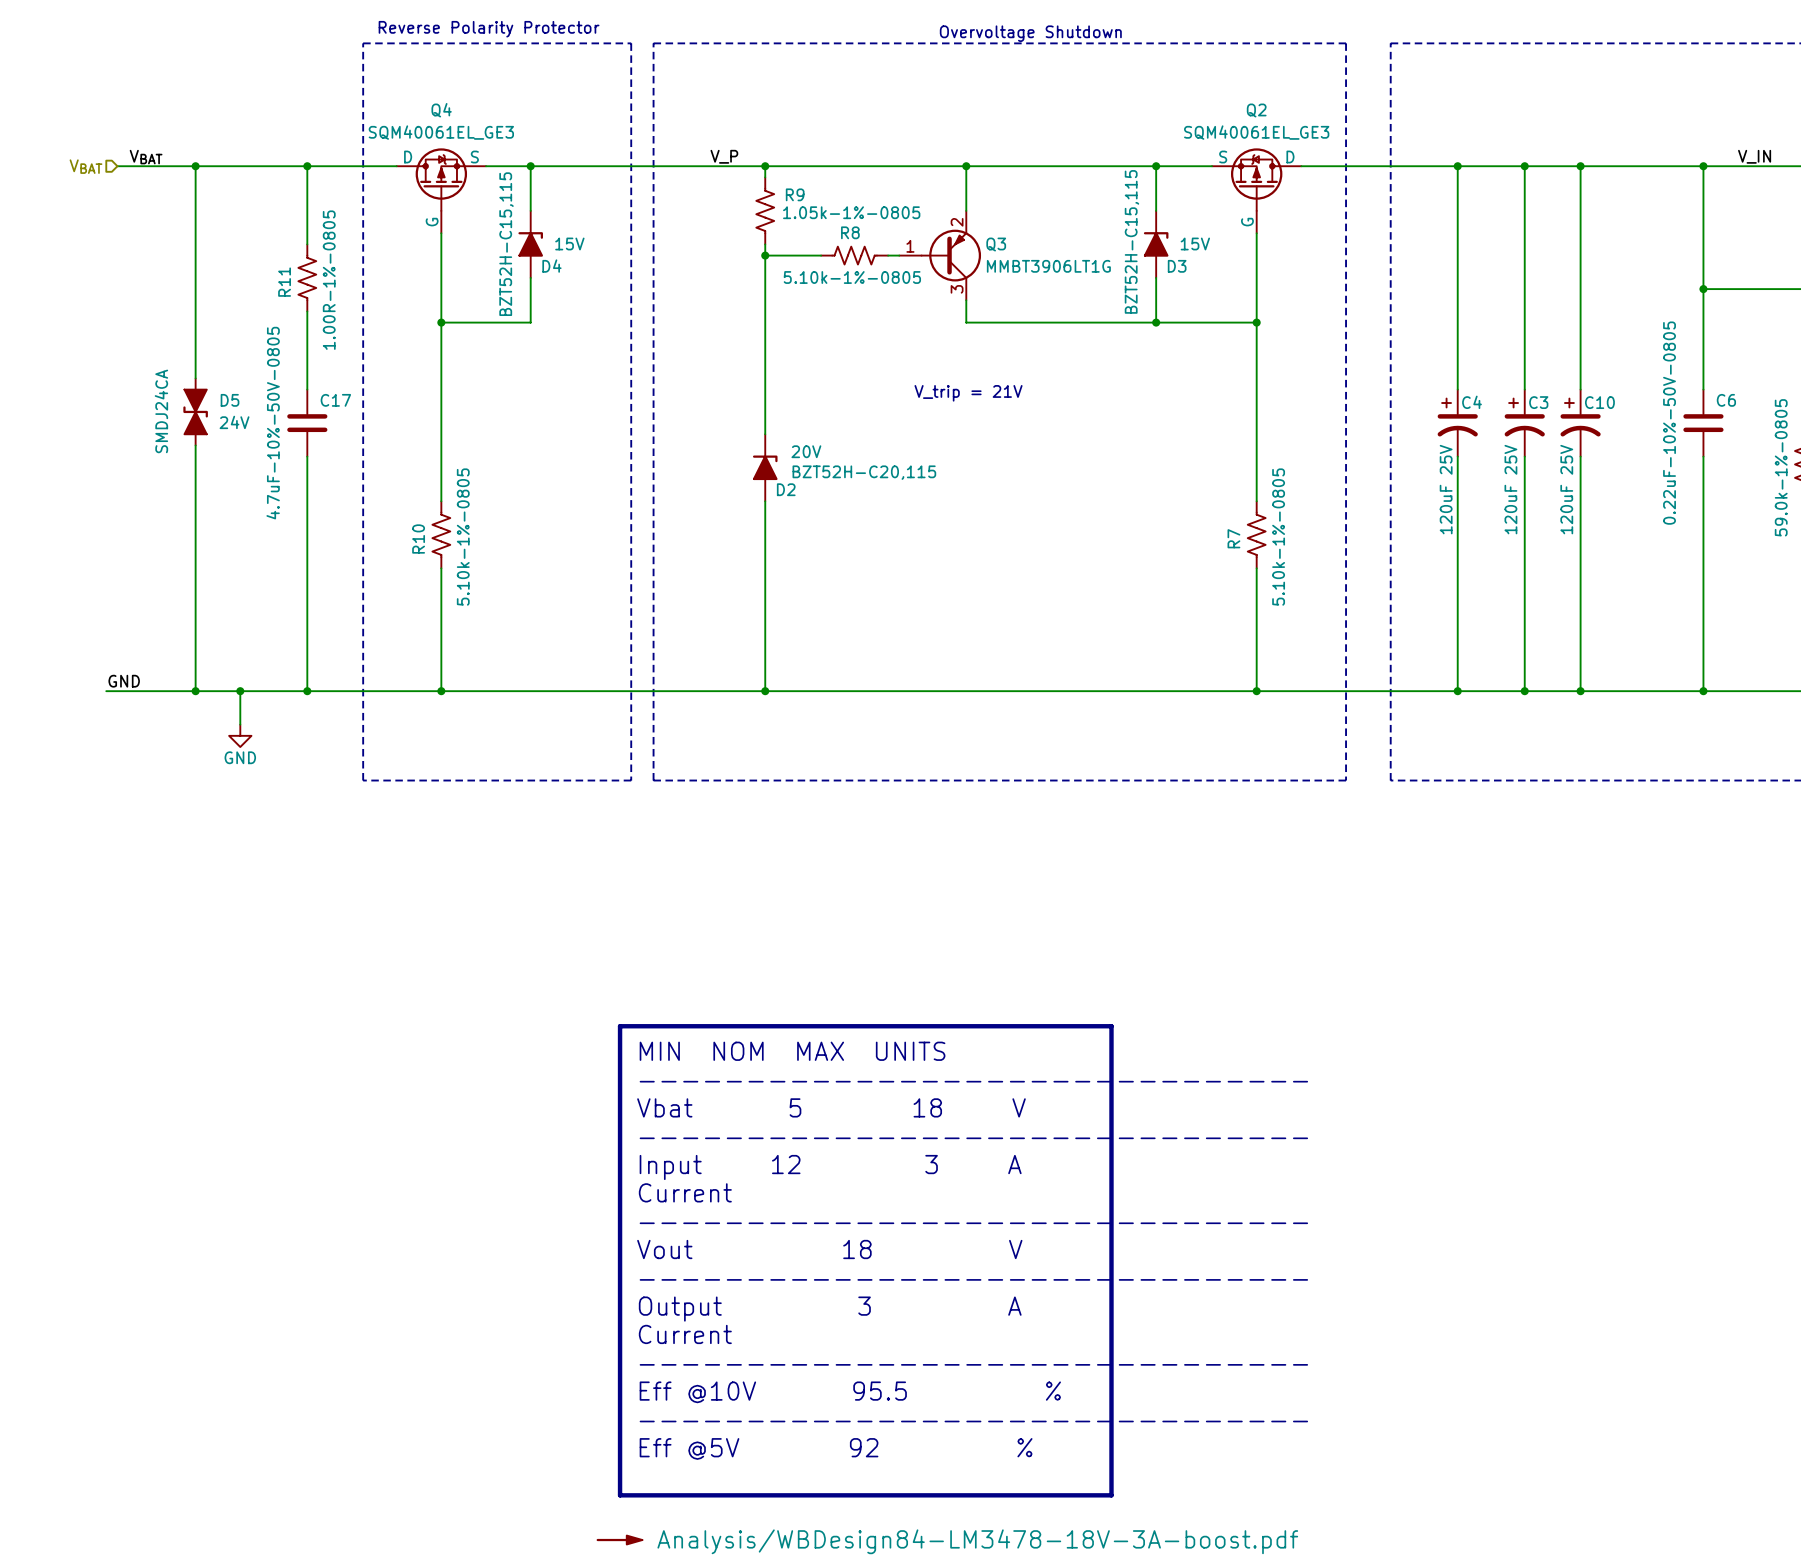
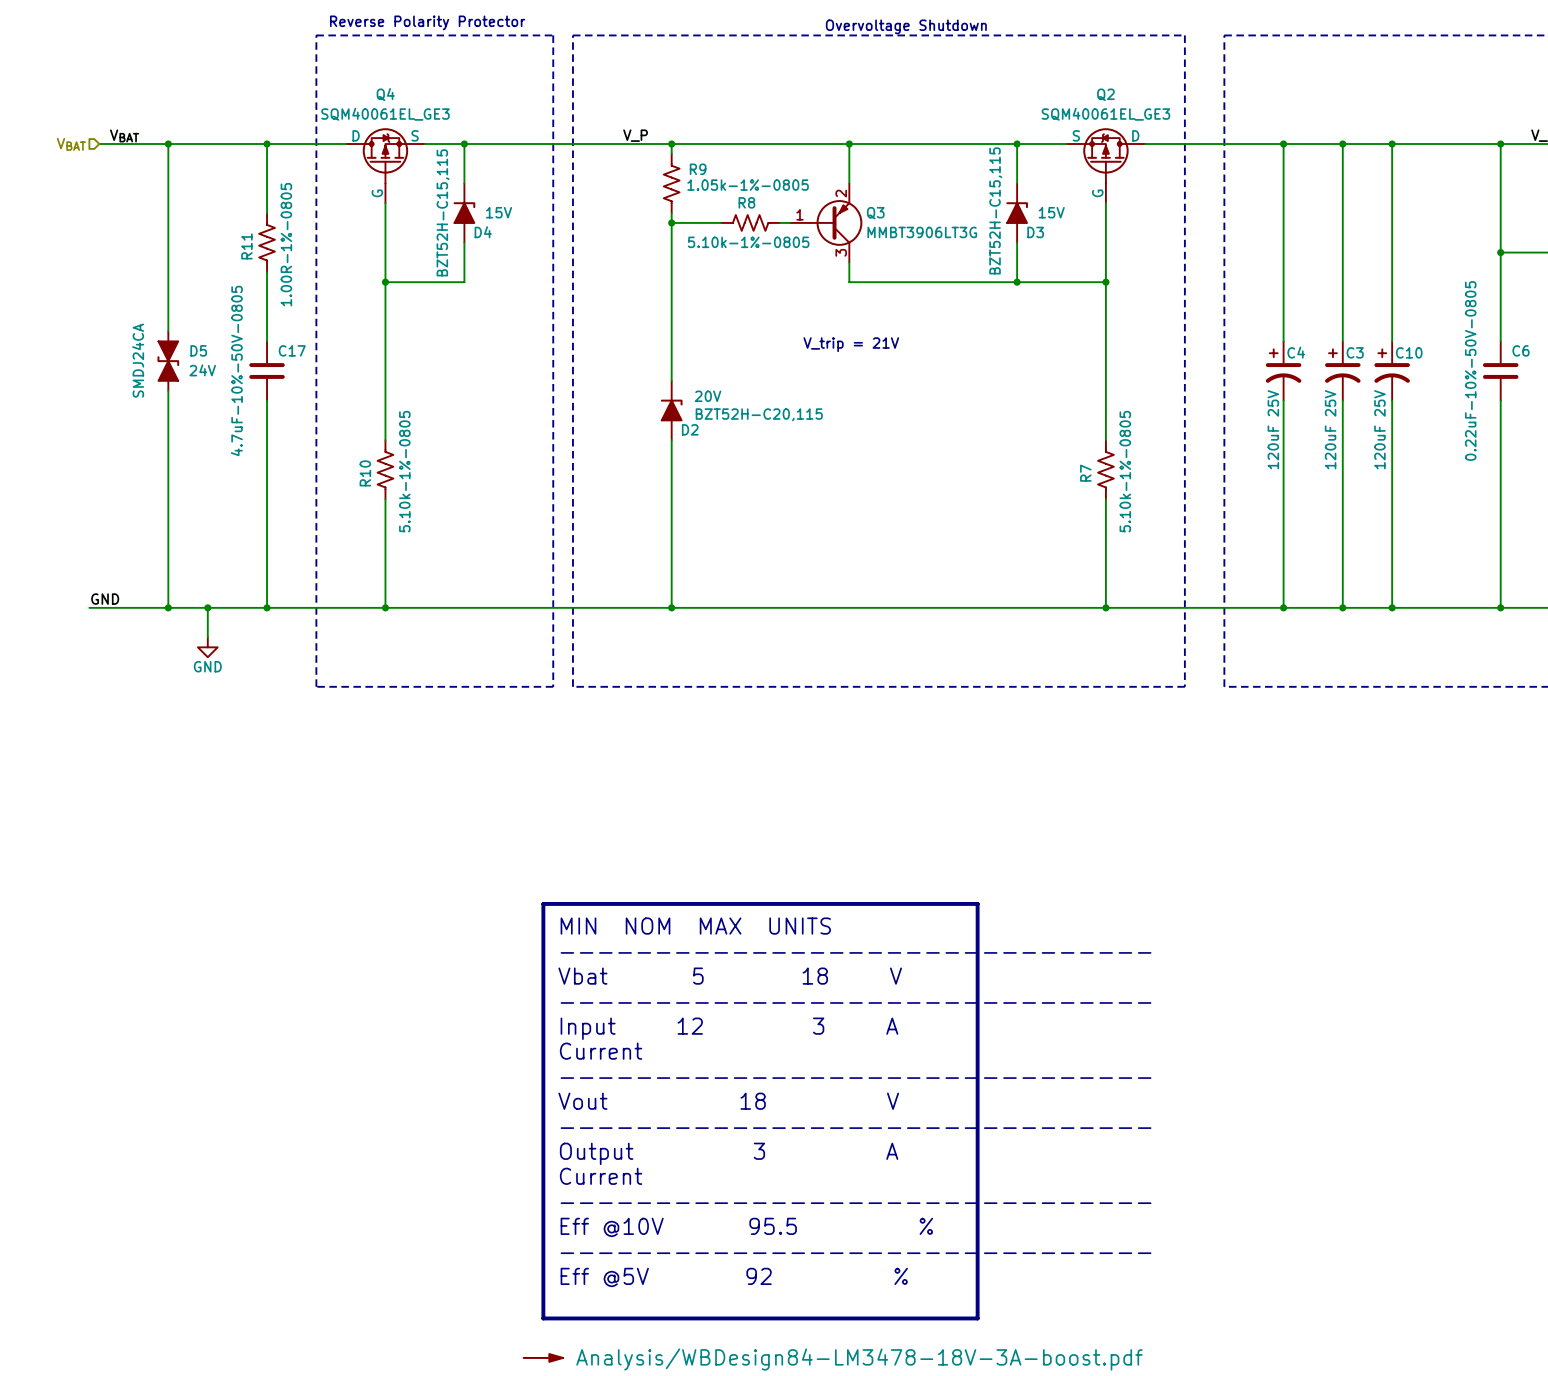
Q3 value: MMBT3906LT1G (1048, 266) -> MMBT3906LT3G (922, 232)

